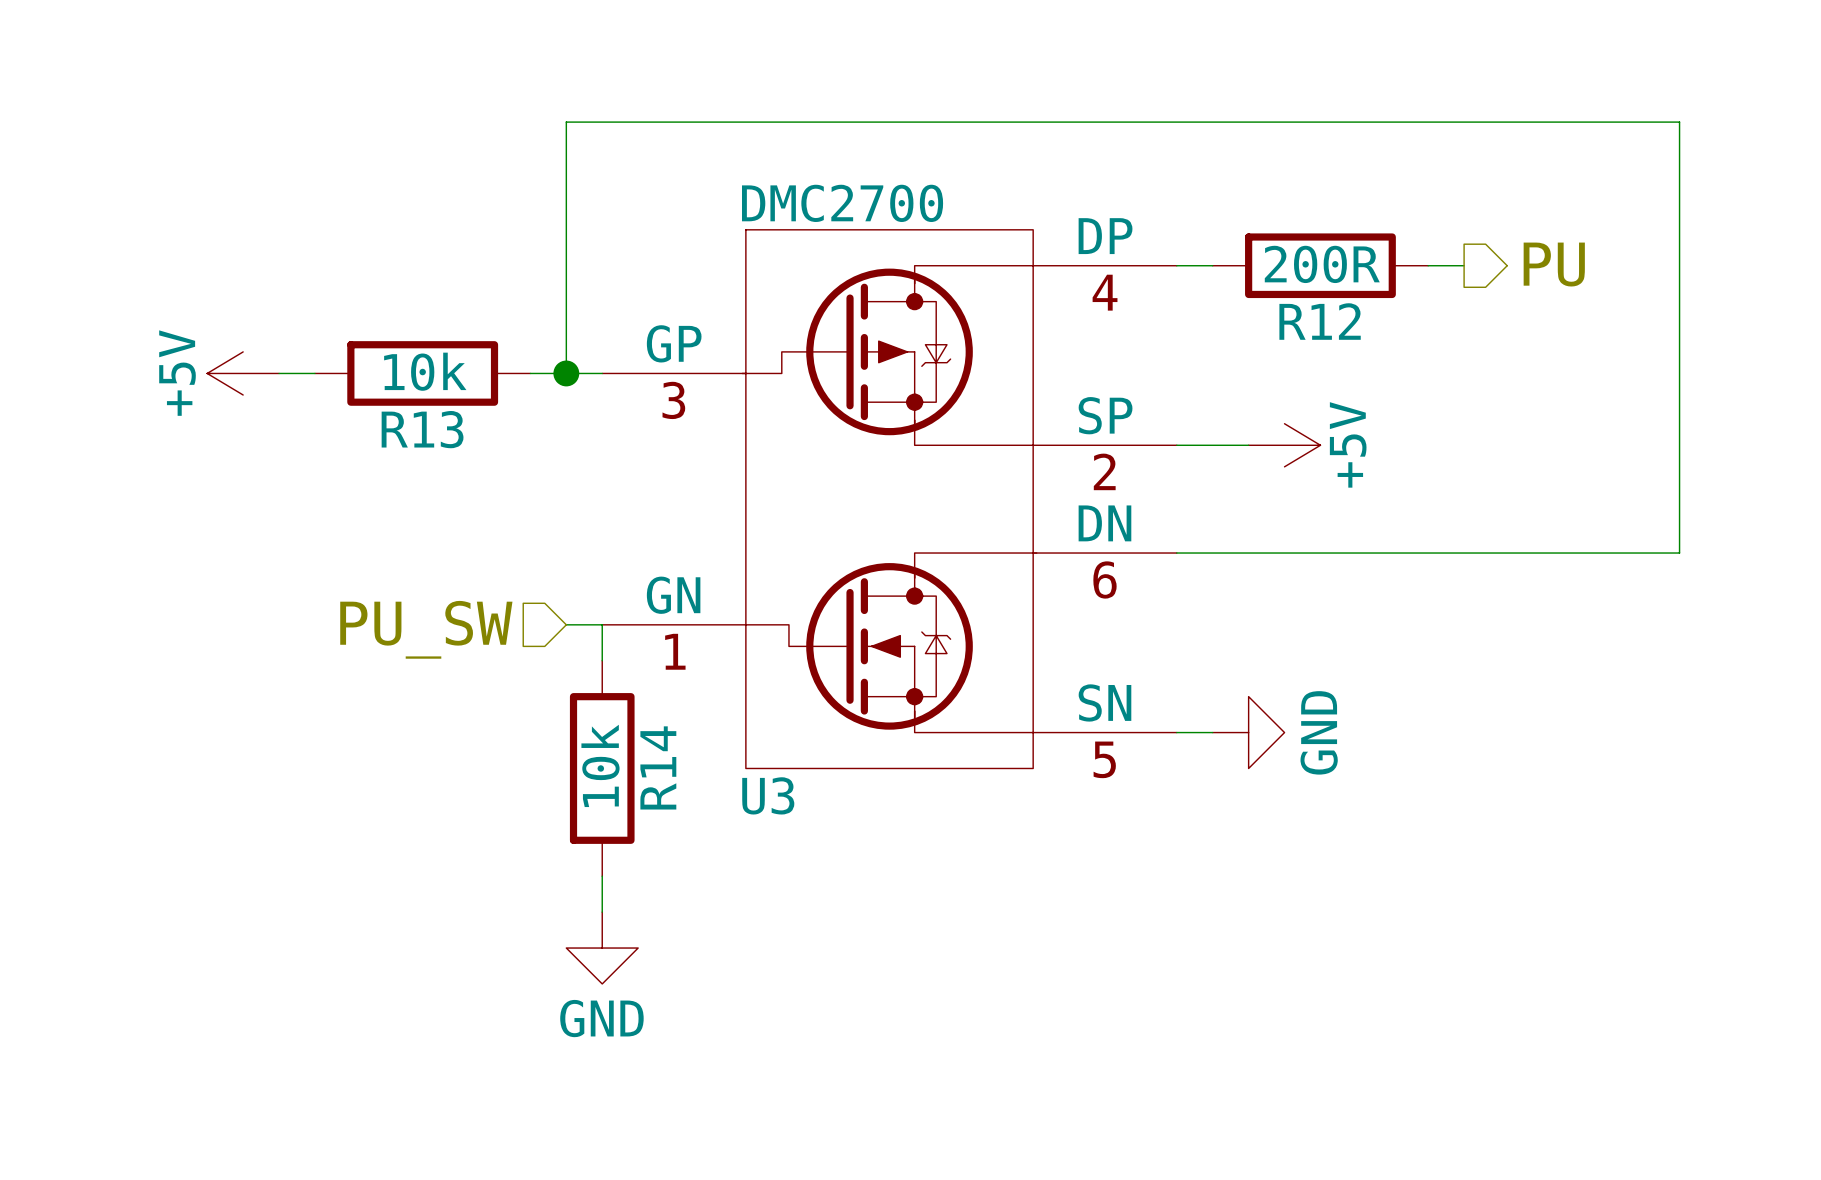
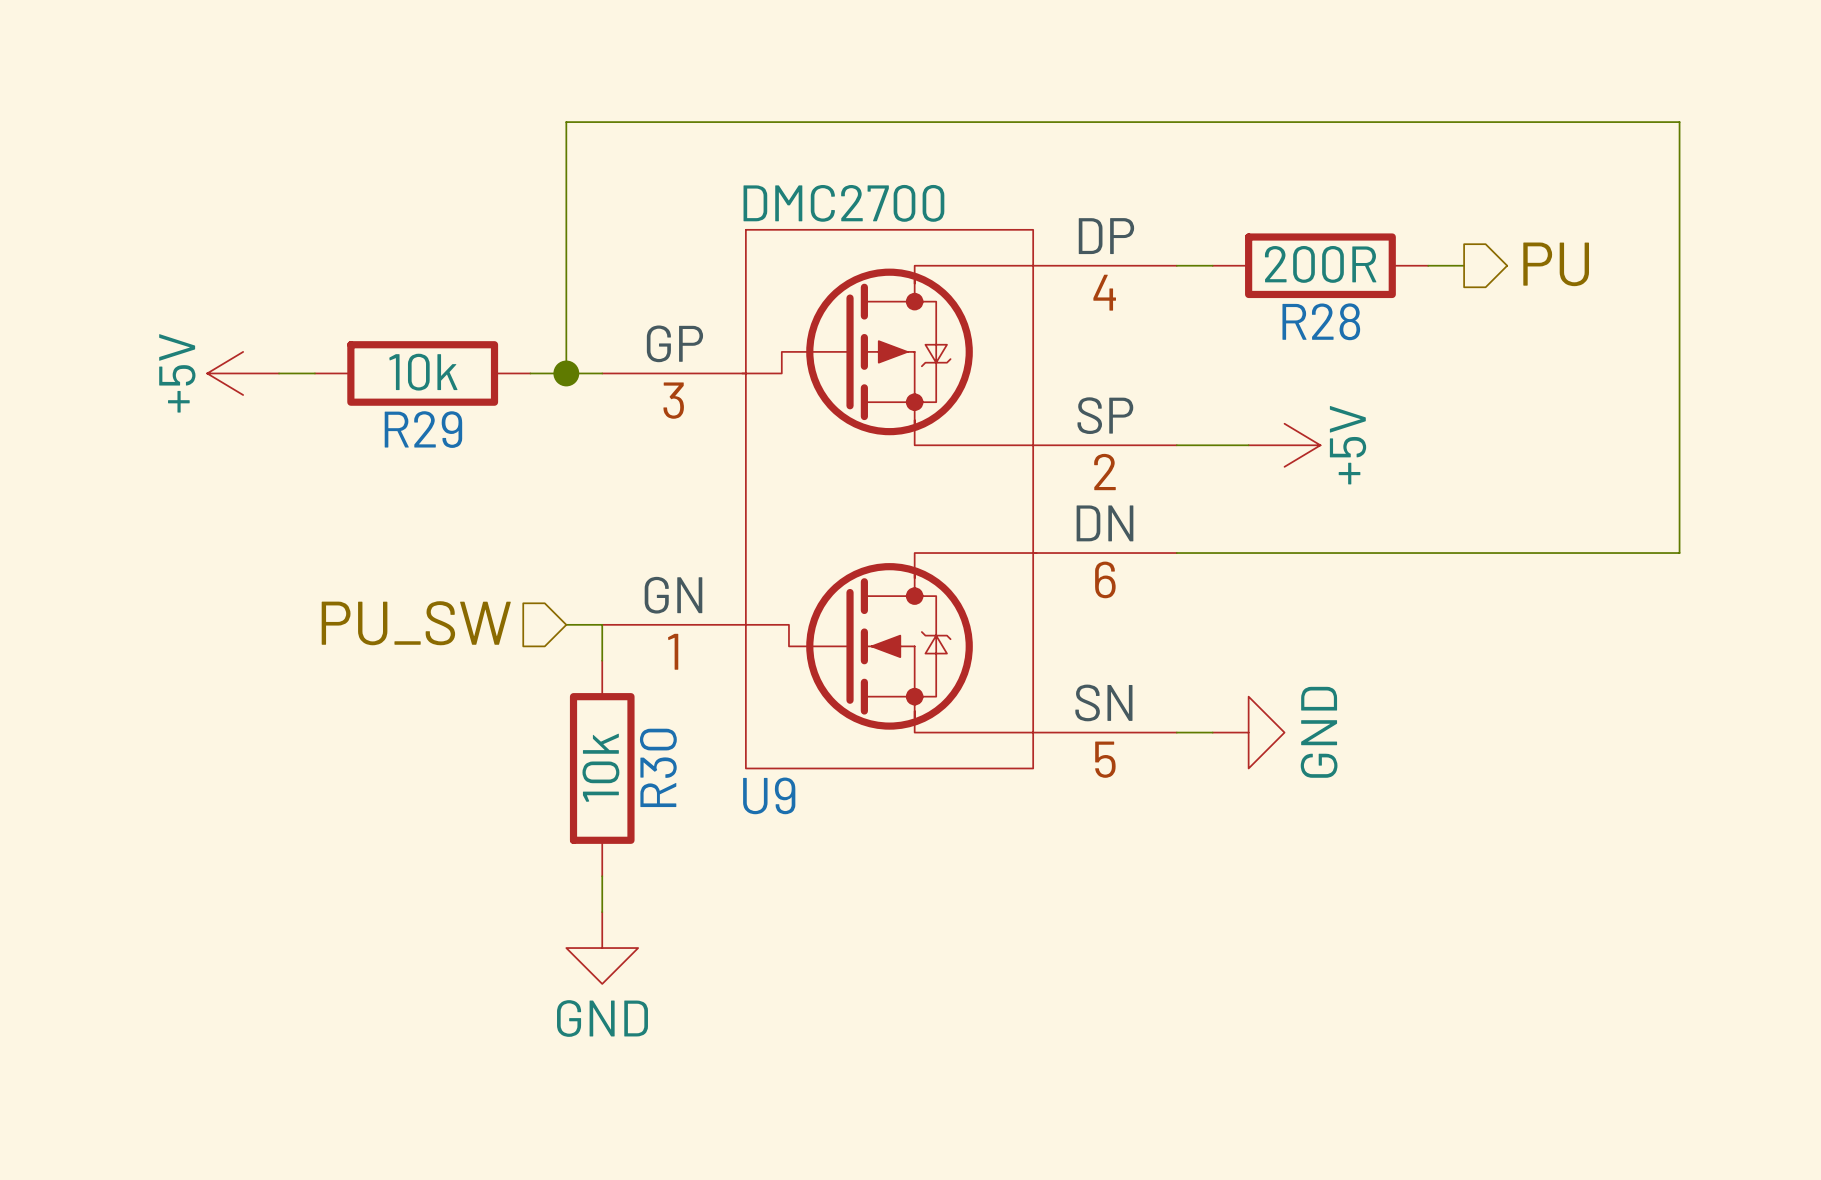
R12 name: R12 (1320, 321) -> R28 (1321, 321)
R13 name: R13 (422, 429) -> R29 (423, 429)
R14 name: R14 (658, 767) -> R30 (658, 767)
U3 name: U3 (768, 795) -> U9 (769, 795)

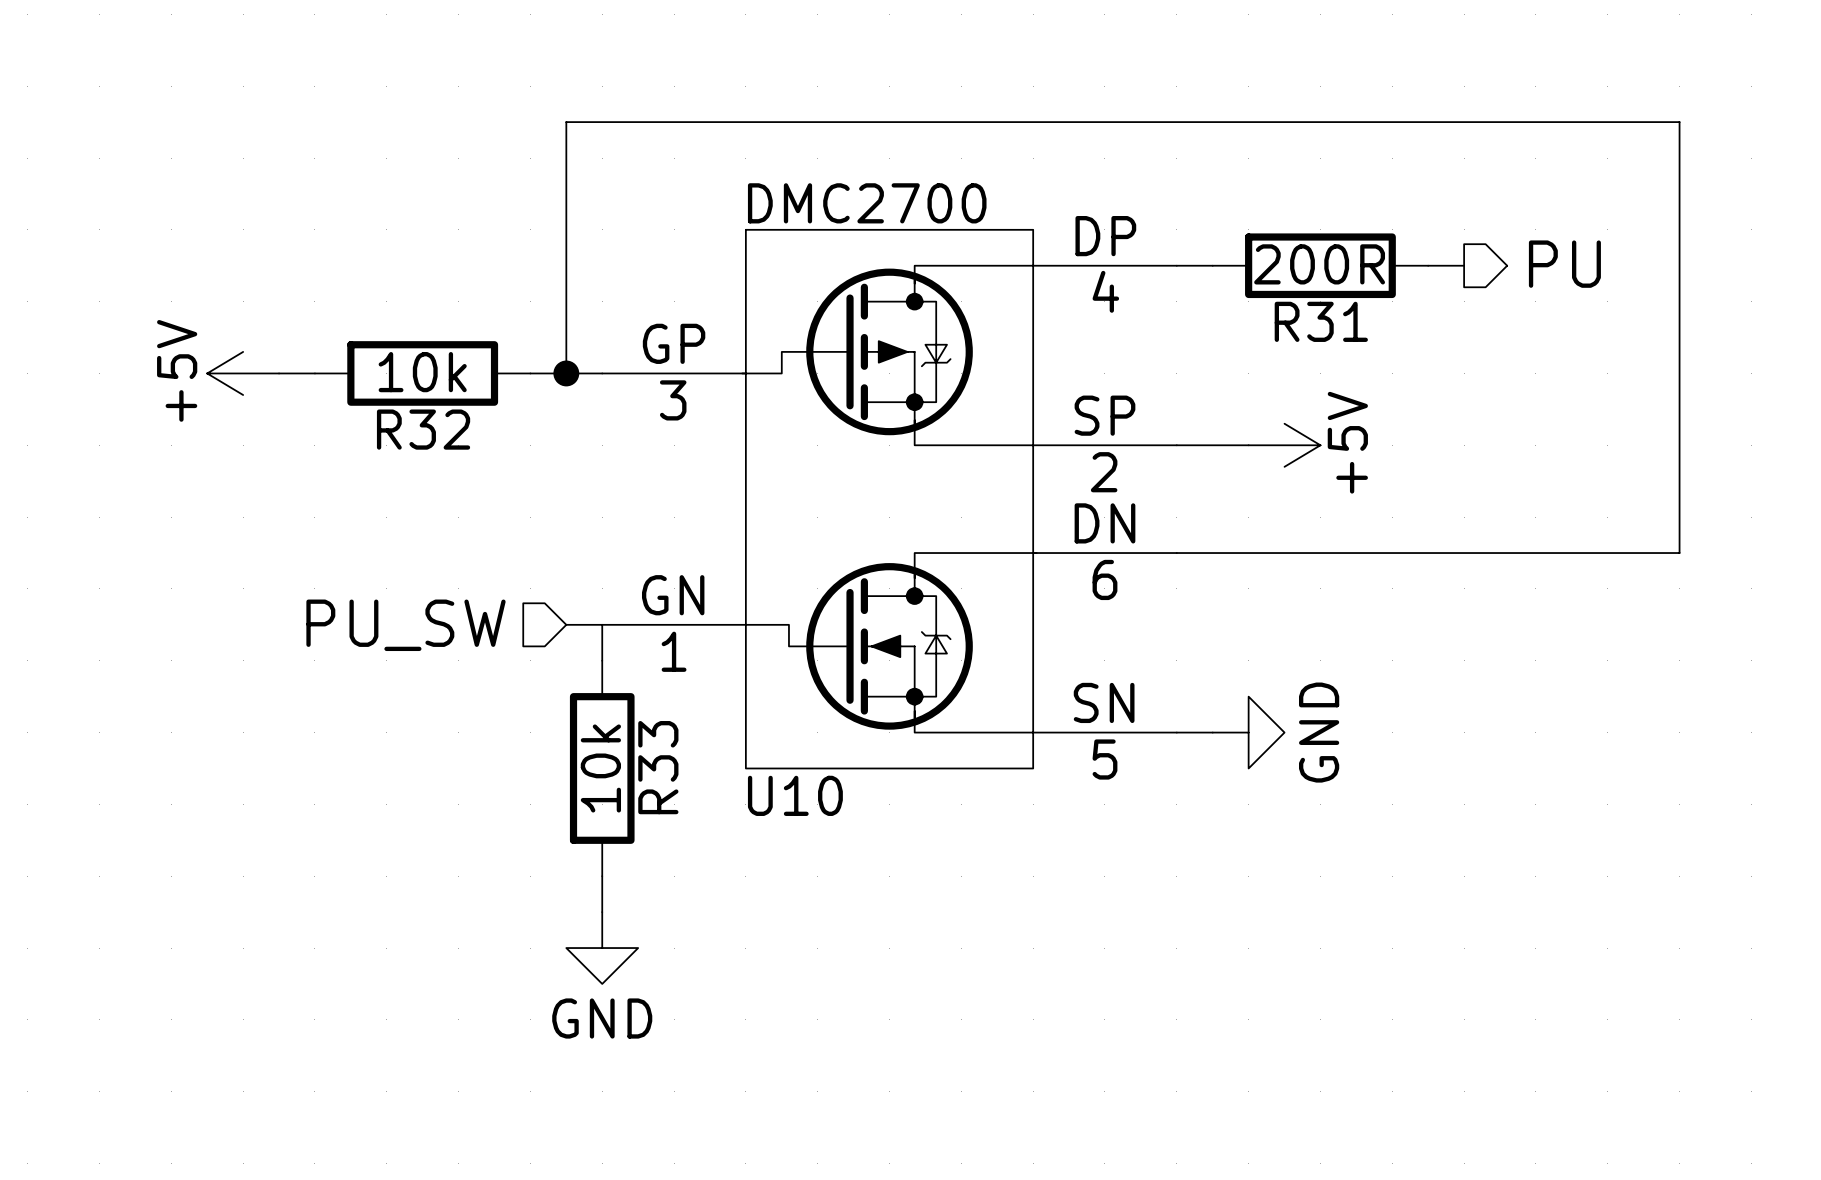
R28 name: R28 (1321, 321) -> R31 (1321, 321)
R29 name: R29 (423, 429) -> R32 (423, 429)
R30 name: R30 (658, 767) -> R33 (658, 767)
U9 name: U9 (769, 795) -> U10 (795, 795)

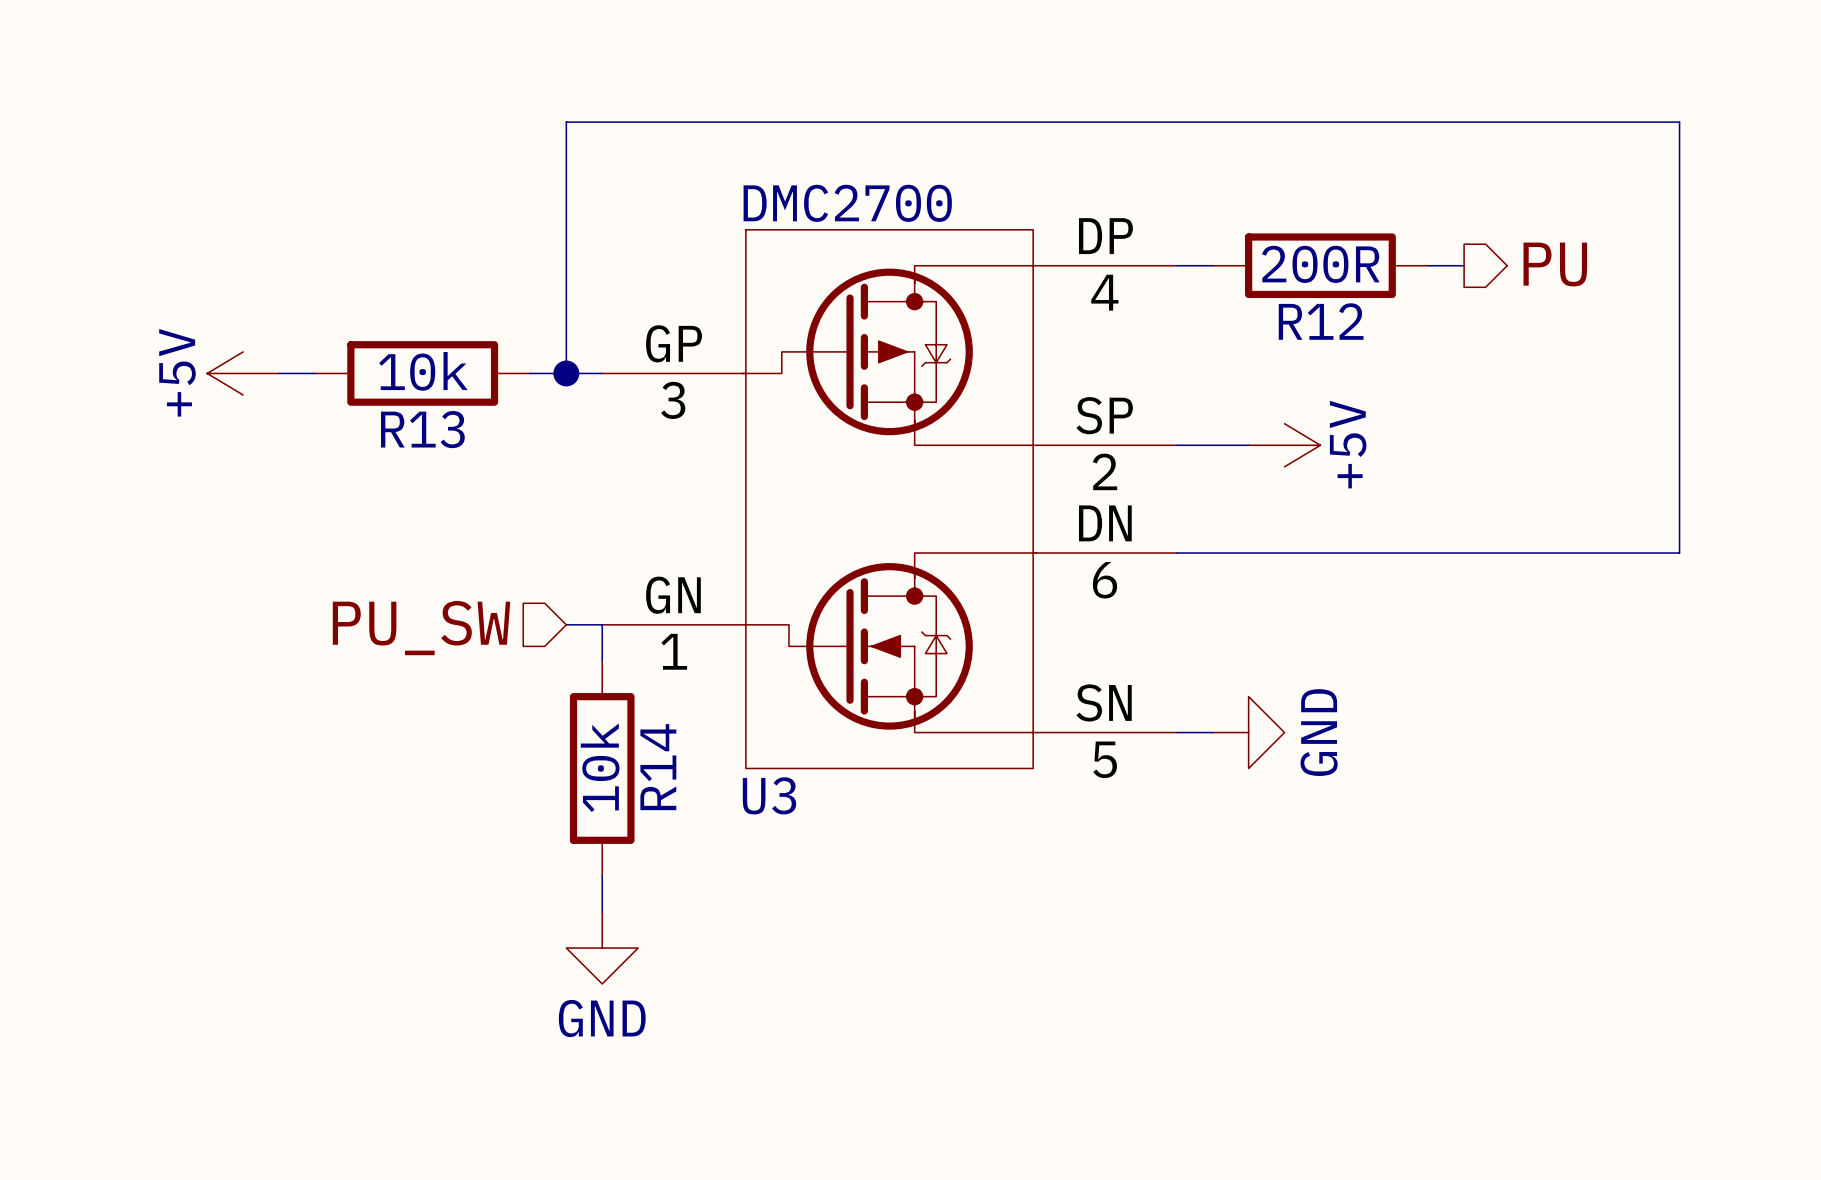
R31 name: R31 (1321, 321) -> R12 (1321, 321)
R32 name: R32 (423, 429) -> R13 (422, 429)
R33 name: R33 (658, 767) -> R14 (658, 767)
U10 name: U10 (795, 795) -> U3 (769, 795)

